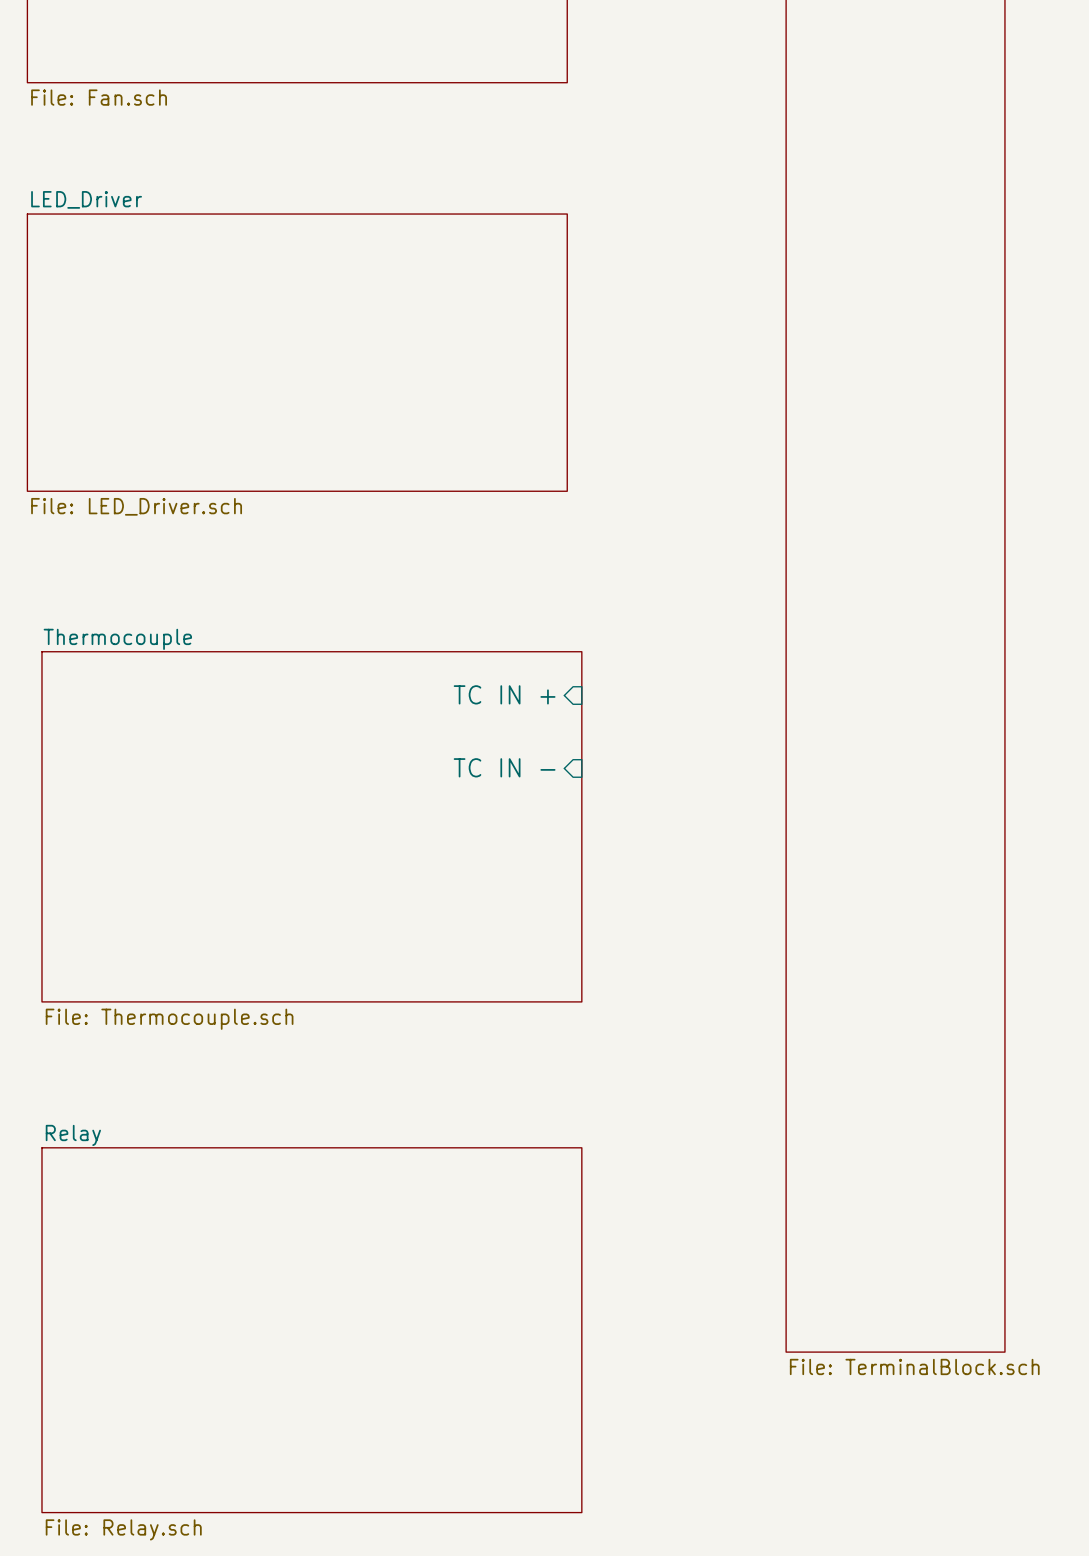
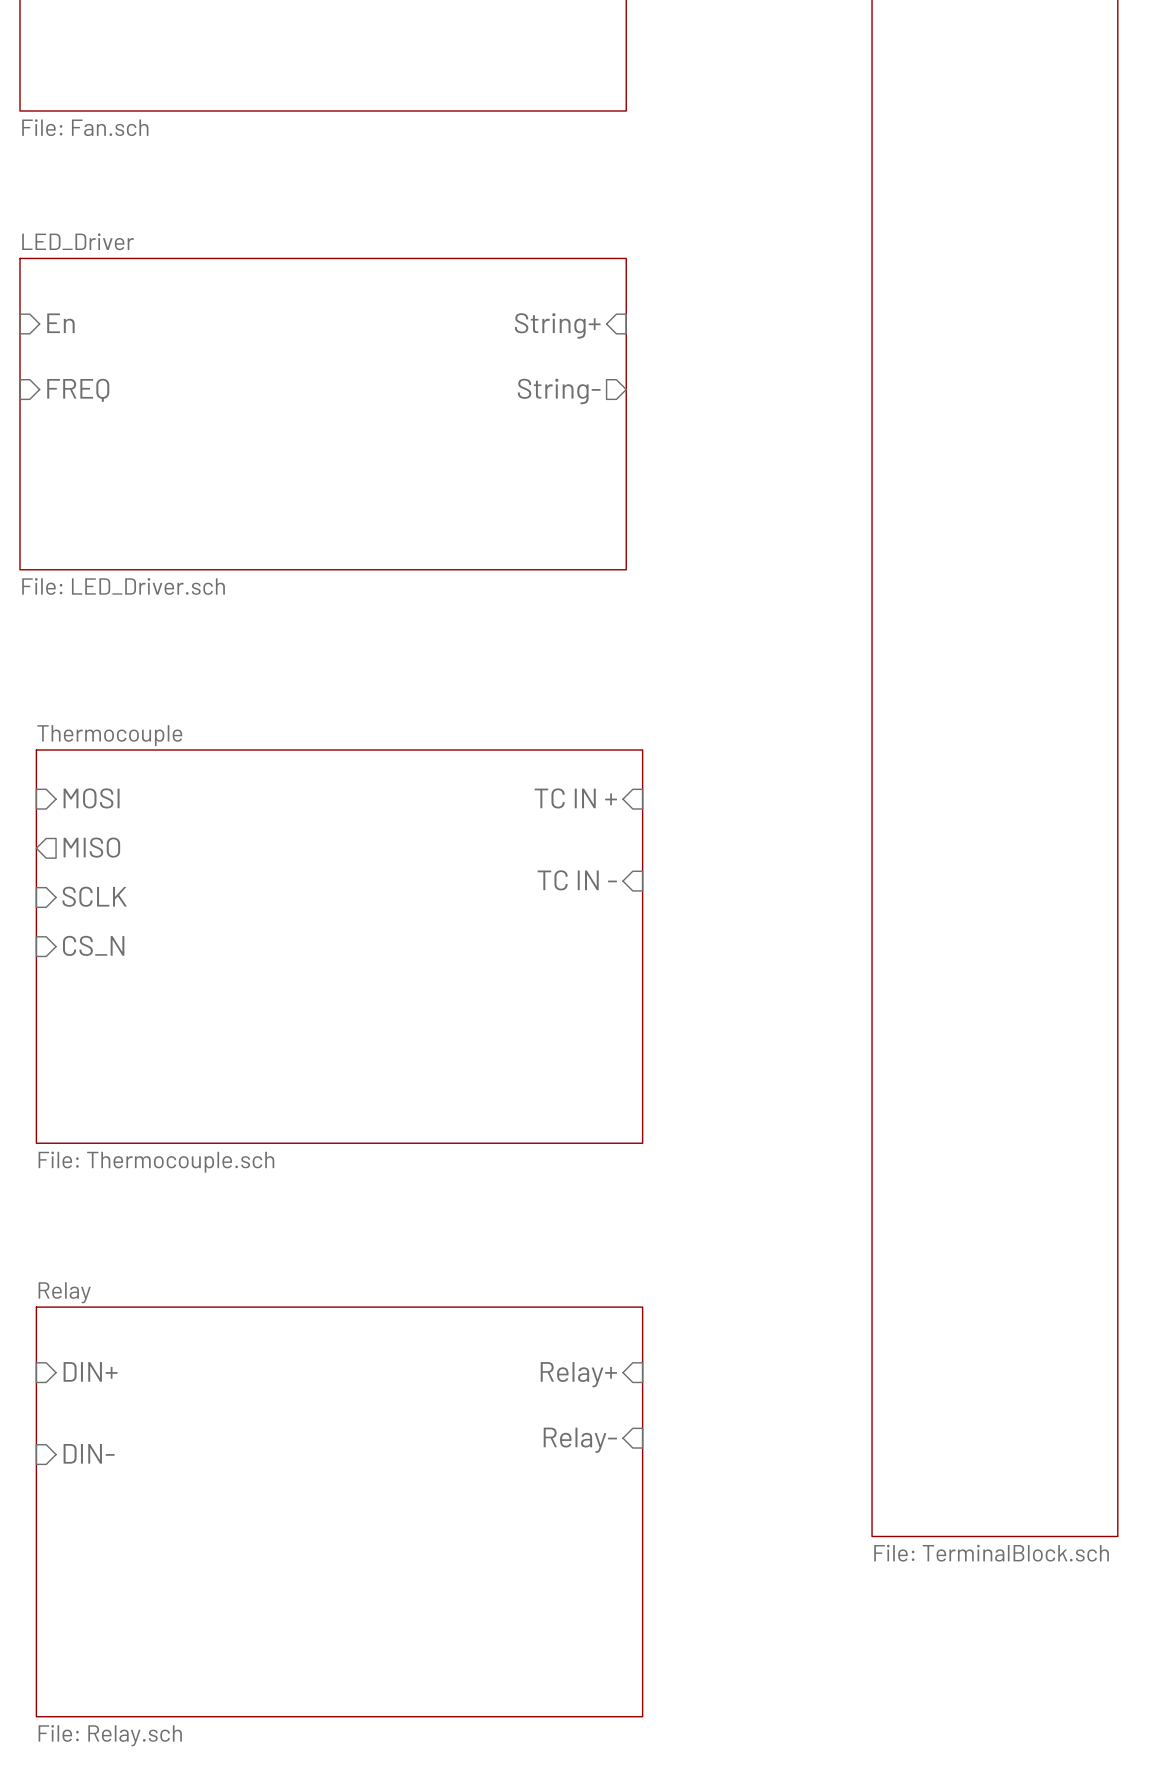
sheet pin: none -> En (60, 323)
sheet pin: none -> String+ (557, 325)
sheet pin: none -> FREQ (78, 390)
sheet pin: none -> String- (559, 391)
sheet pin: none -> MOSI (91, 798)
sheet pin: none -> MISO (91, 847)
sheet pin: none -> SCLK (94, 896)
sheet pin: none -> CS_N (93, 945)
sheet pin: none -> DIN+ (90, 1371)
sheet pin: none -> Relay+ (578, 1374)
sheet pin: none -> Relay- (580, 1440)
sheet pin: none -> DIN- (89, 1453)

